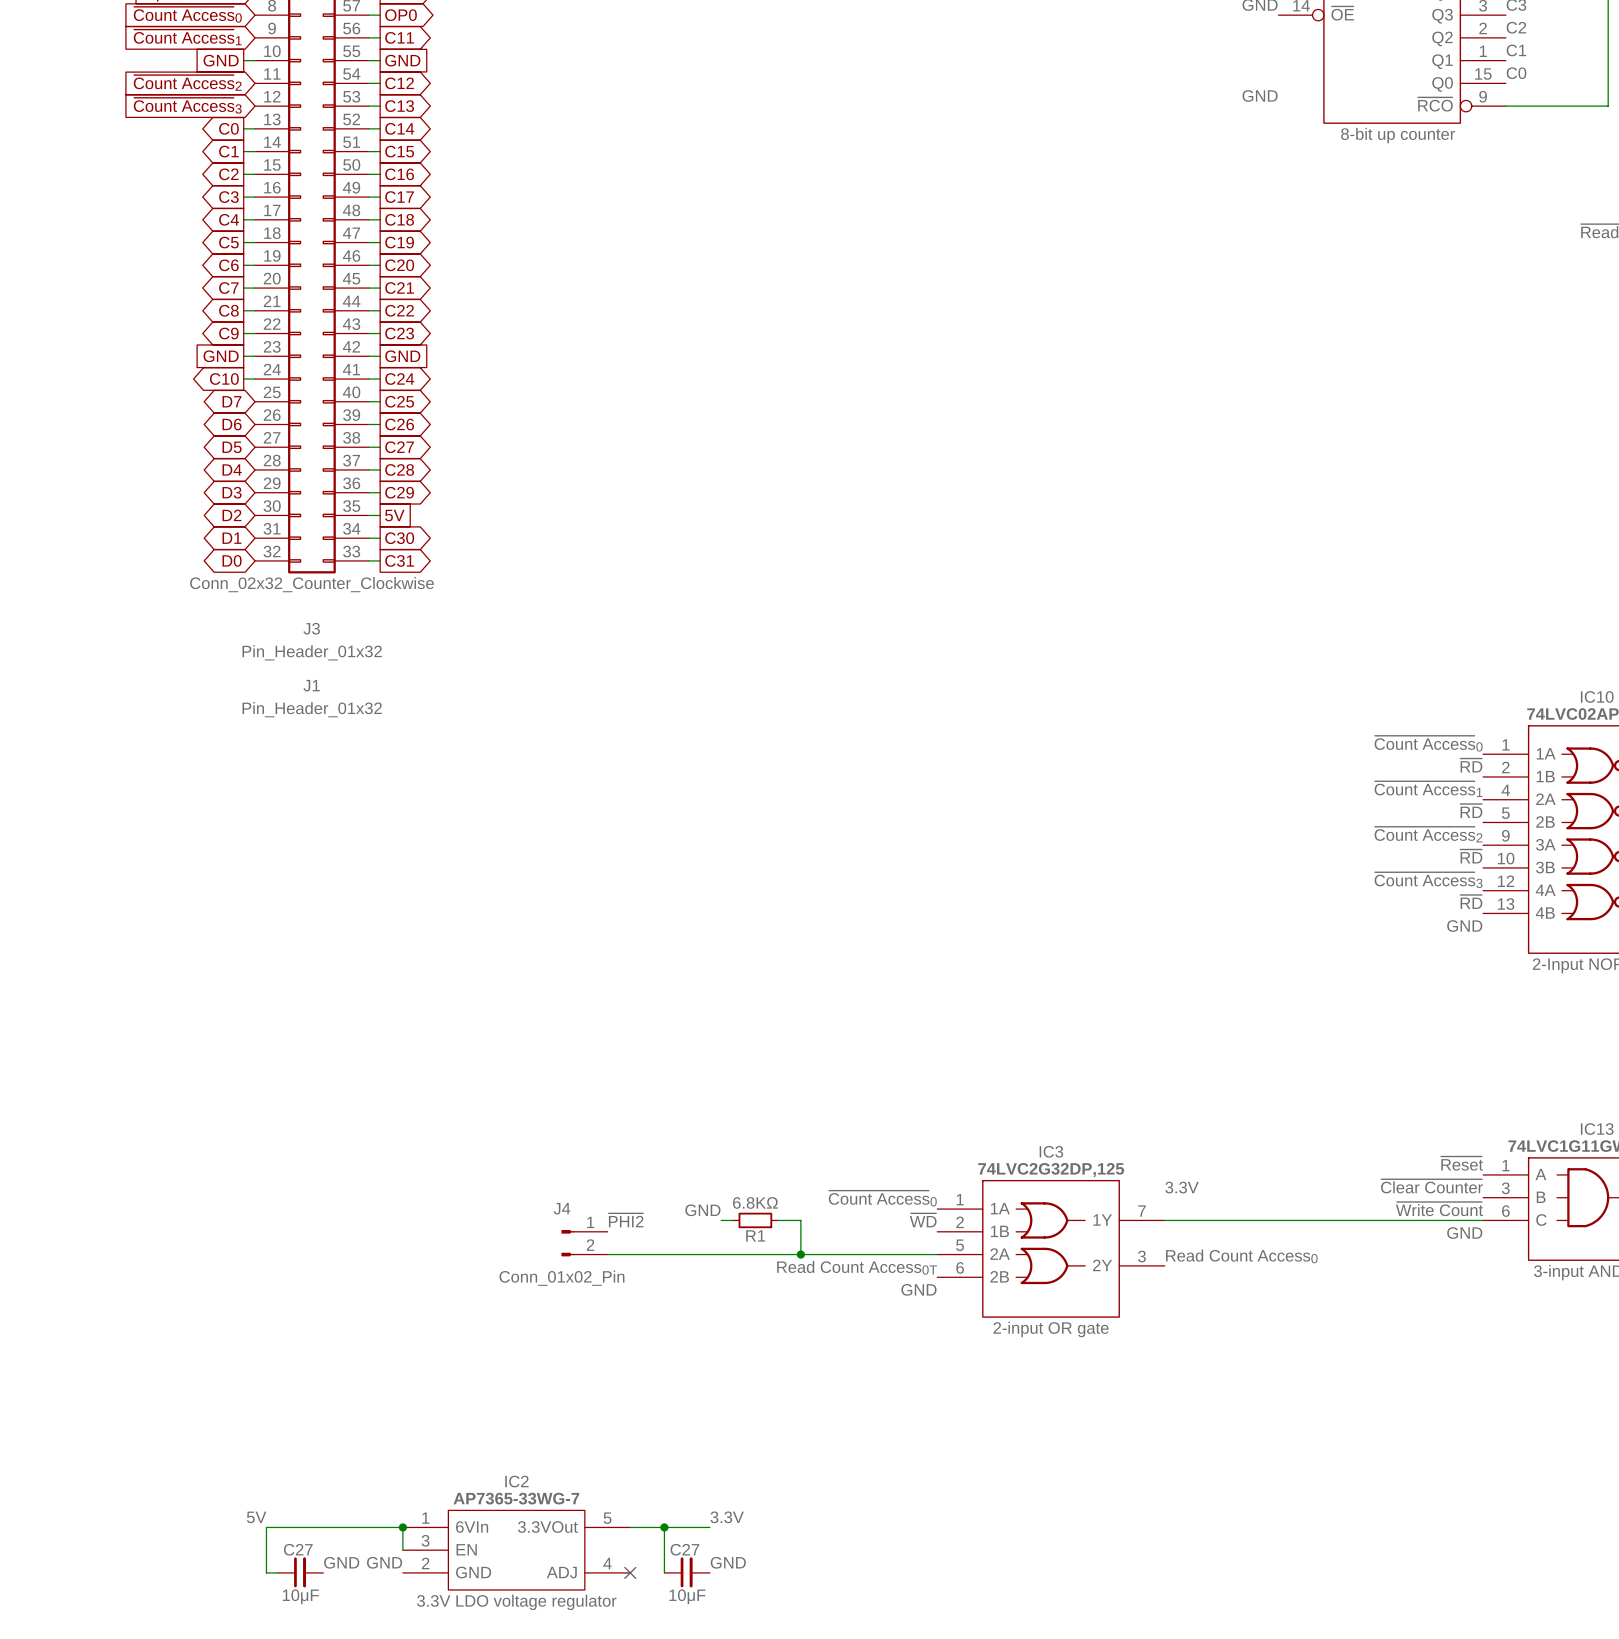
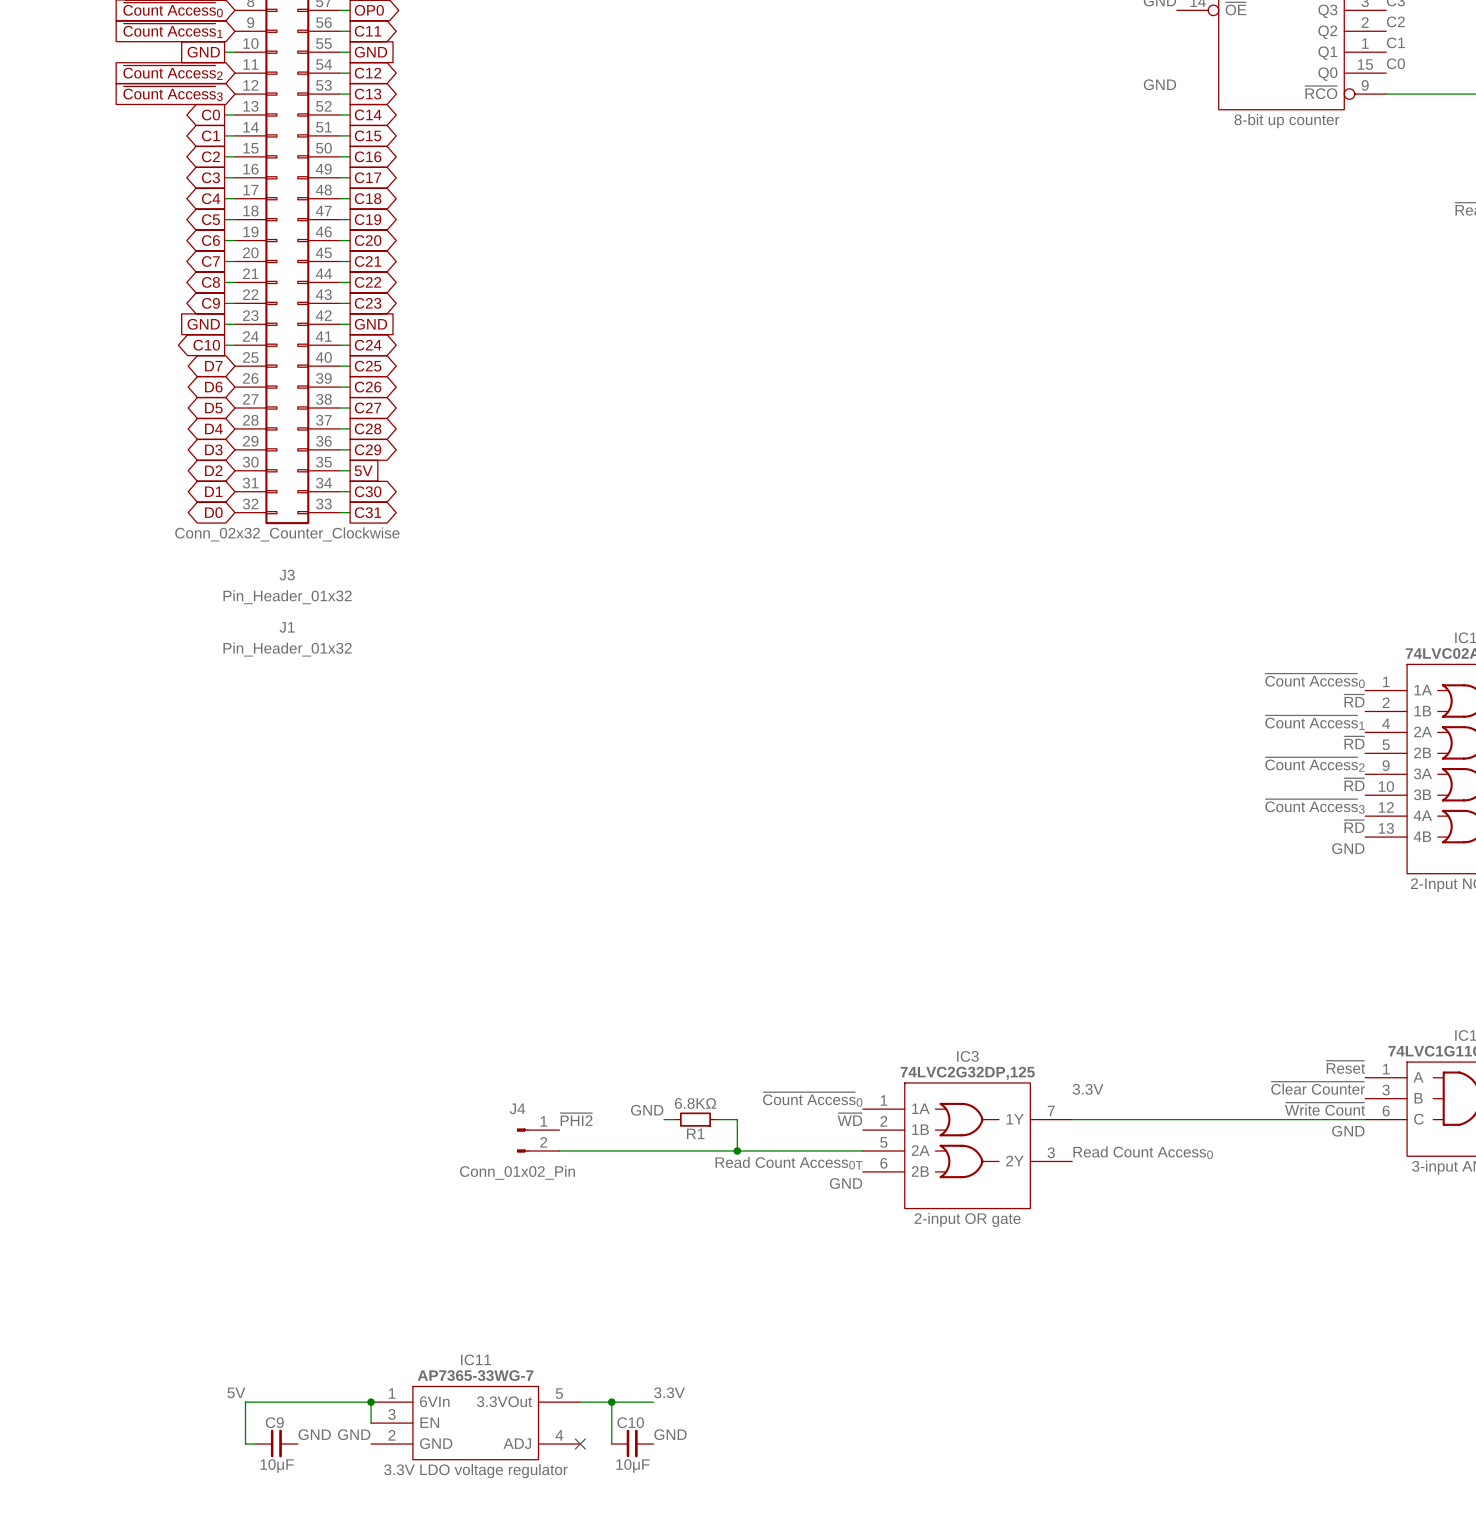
IC2 name: IC2 (516, 1481) -> IC11 (476, 1359)
C27 name: C27 (298, 1549) -> C9 (274, 1422)
C27 name: C27 (684, 1549) -> C10 (630, 1422)

